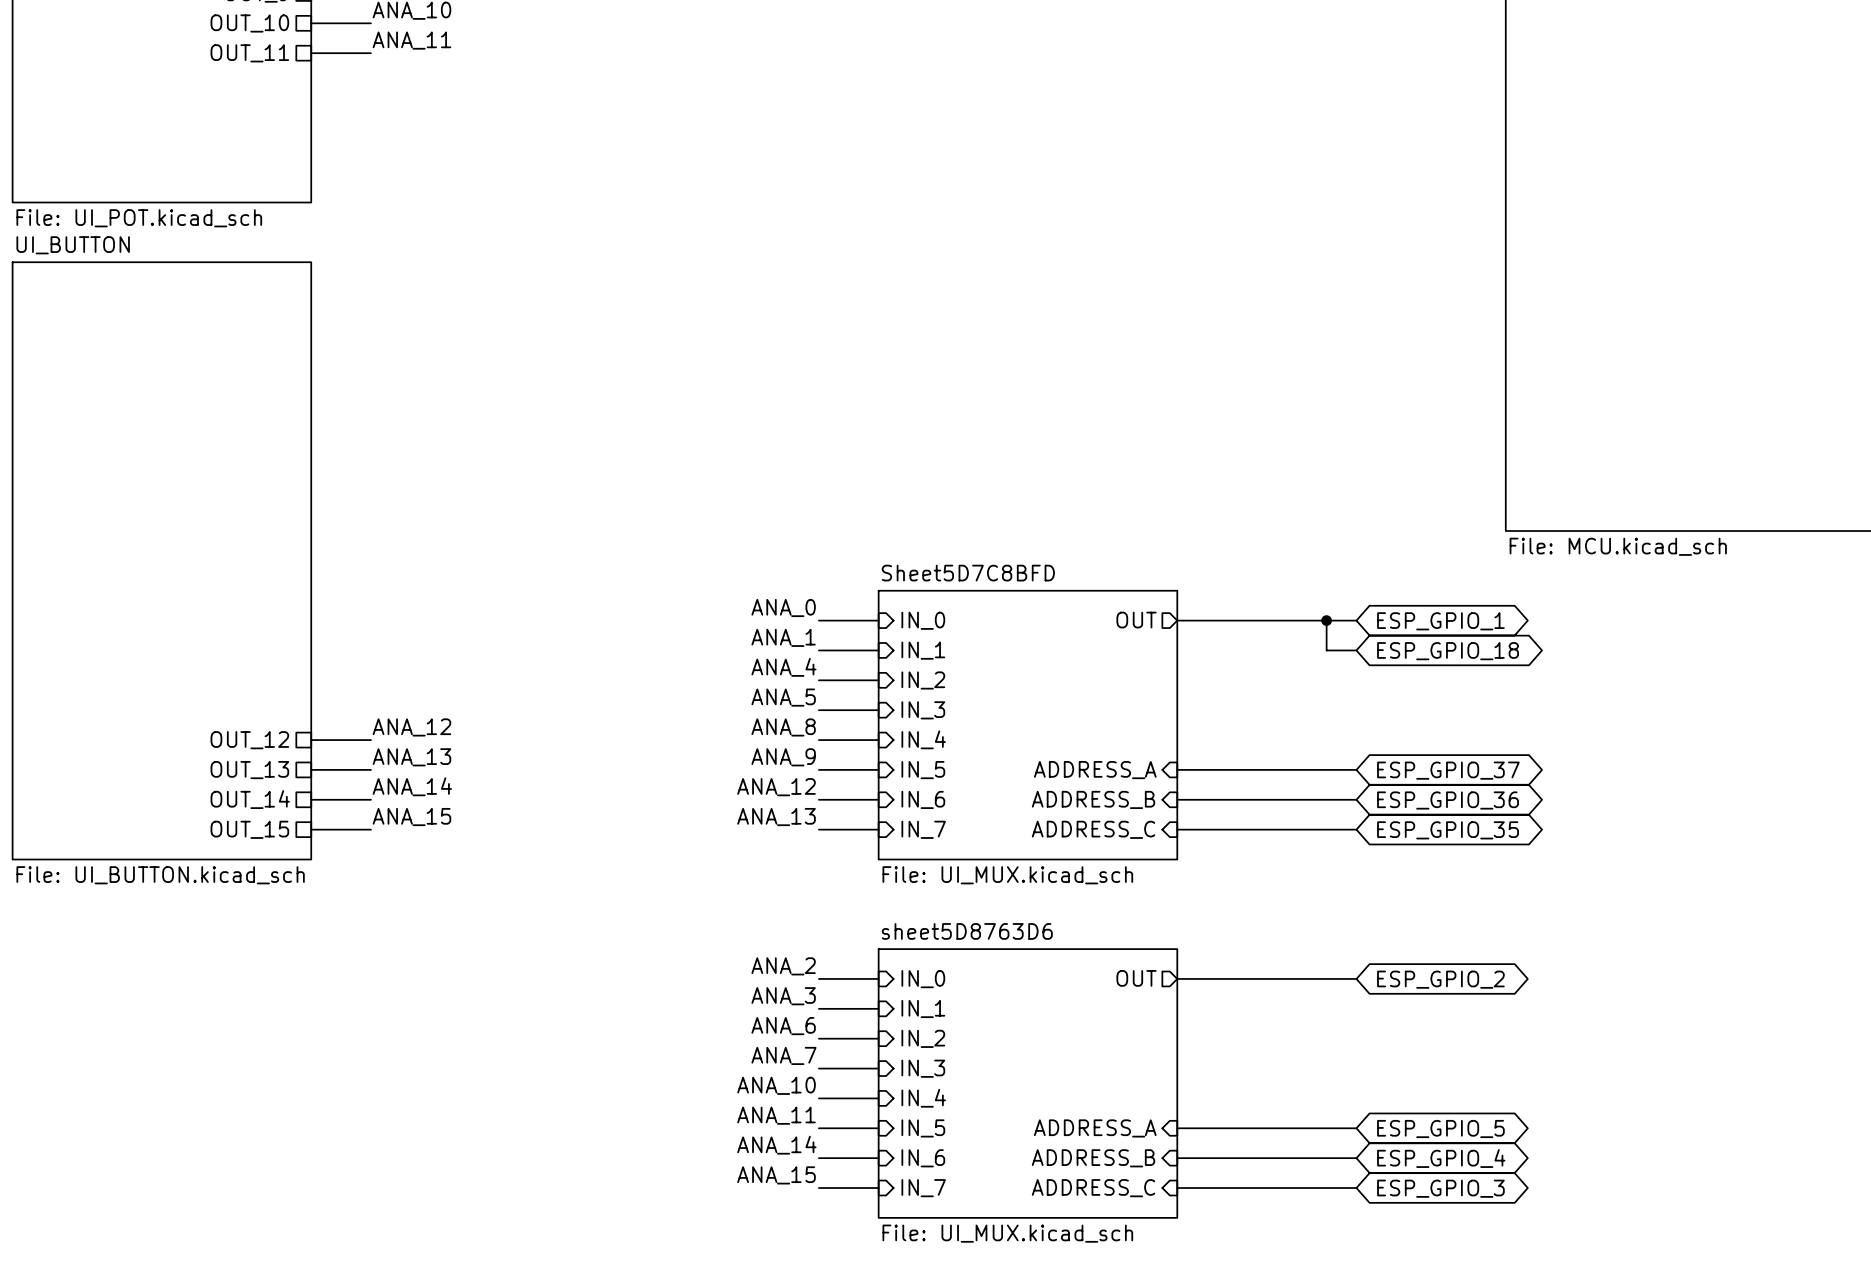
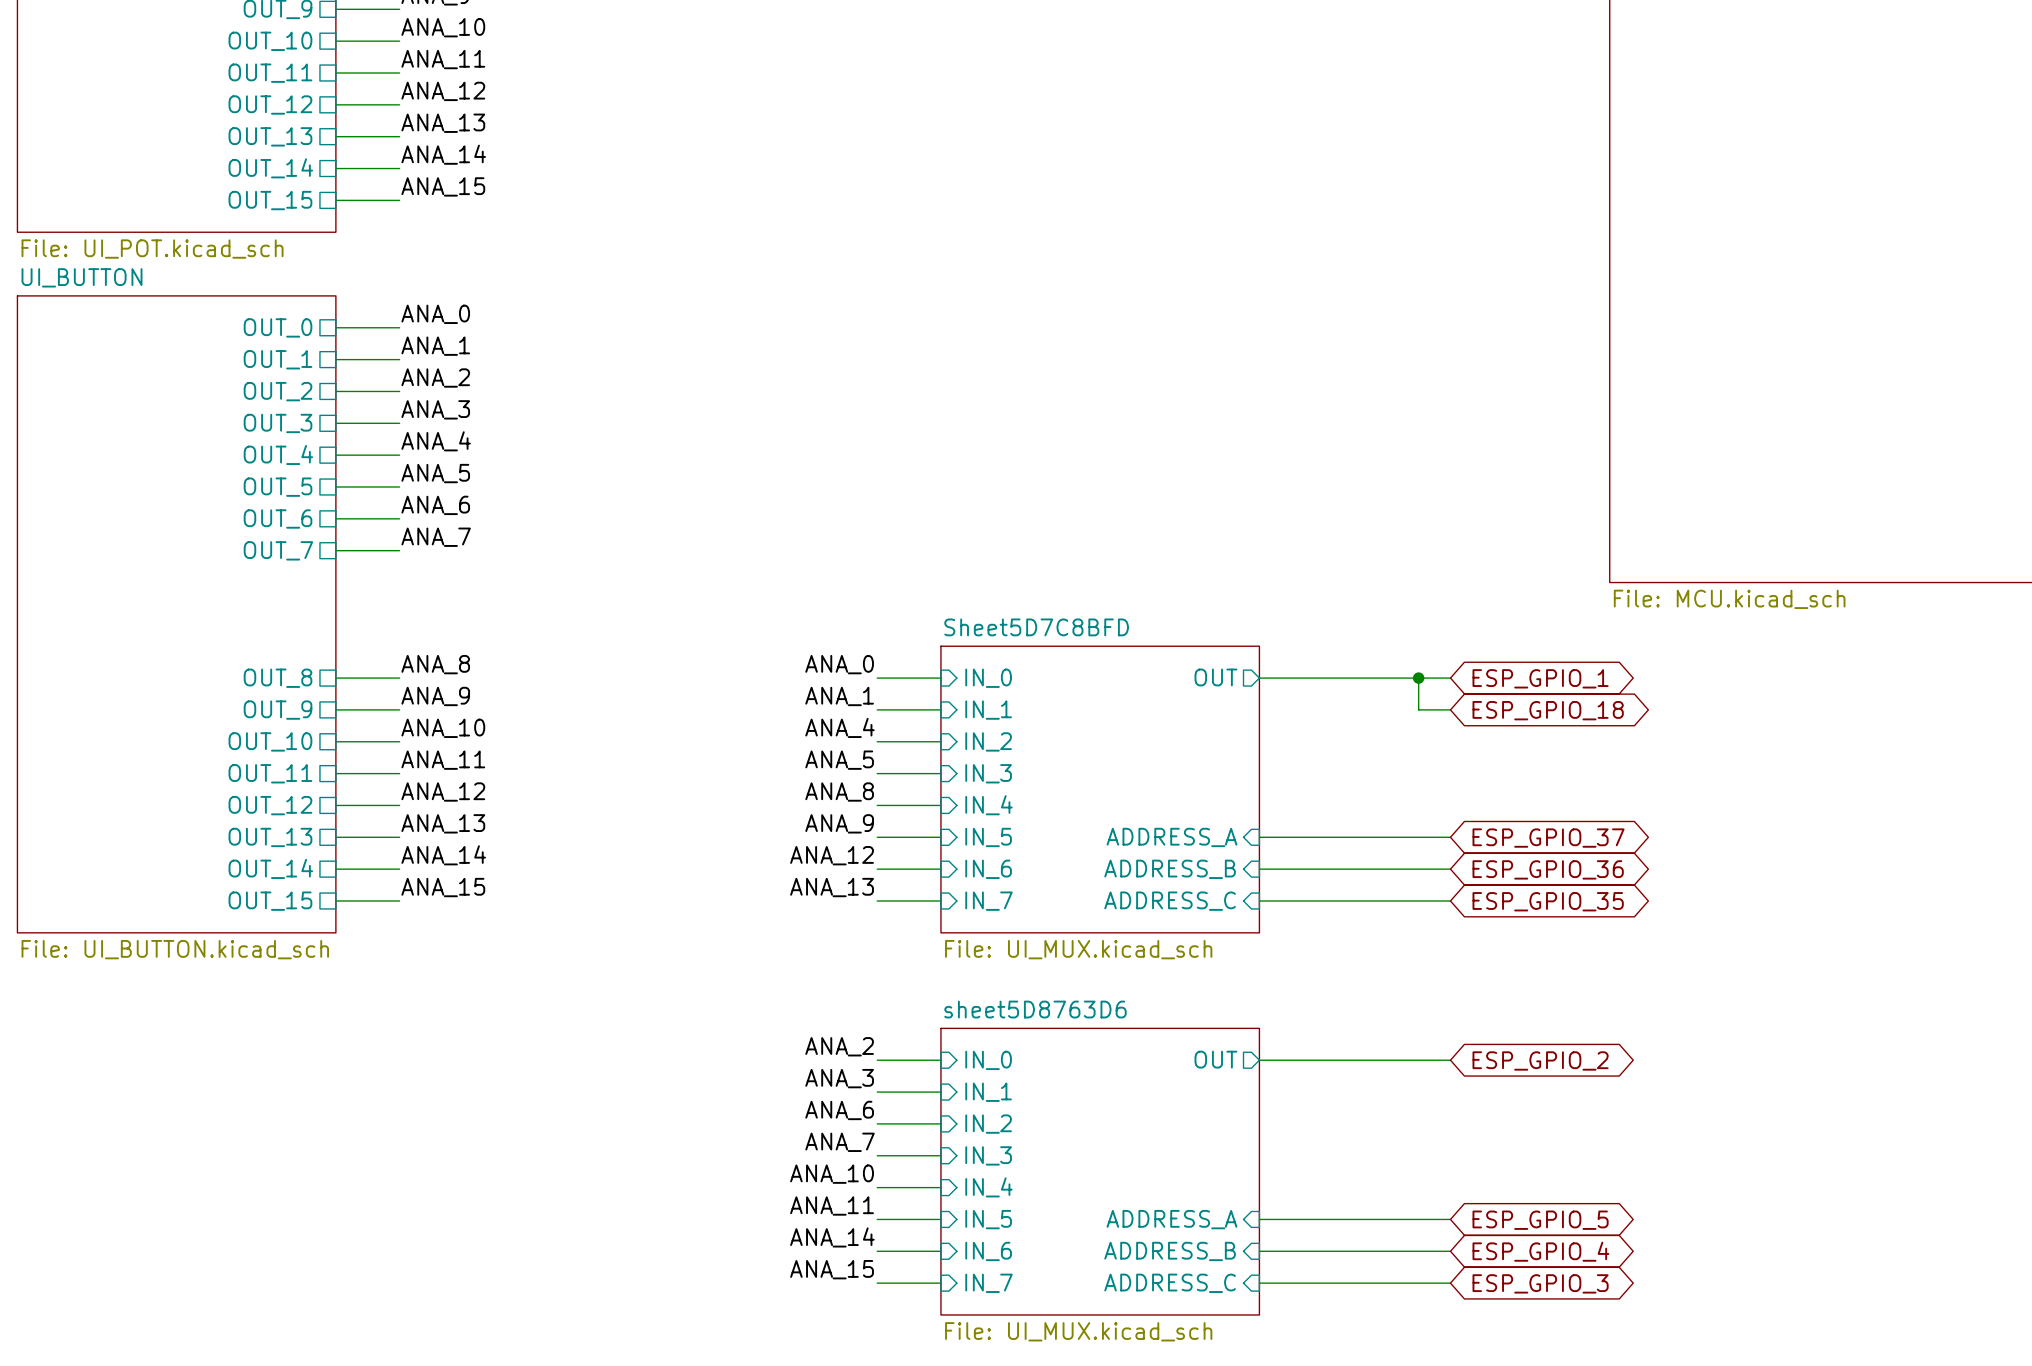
label: none -> ANA_12 (443, 91)
sheet pin: none -> OUT_12 (270, 105)
wire: none -> (335, 104) (399, 104)
label: none -> ANA_13 (443, 123)
wire: none -> (335, 136) (399, 136)
sheet pin: none -> OUT_13 (270, 136)
label: none -> ANA_14 (443, 154)
sheet pin: none -> OUT_14 (270, 168)
wire: none -> (335, 168) (399, 168)
label: none -> ANA_15 (443, 186)
sheet pin: none -> OUT_15 (270, 200)
wire: none -> (335, 200) (399, 200)
label: none -> ANA_0 (435, 314)
sheet pin: none -> OUT_0 (278, 327)
wire: none -> (335, 327) (399, 327)
label: none -> ANA_1 (435, 346)
wire: none -> (335, 359) (399, 359)
sheet pin: none -> OUT_1 (278, 359)
label: none -> ANA_2 (435, 378)
sheet pin: none -> OUT_2 (278, 391)
wire: none -> (335, 391) (399, 391)
label: none -> ANA_3 (435, 409)
sheet pin: none -> OUT_3 (278, 423)
wire: none -> (335, 423) (399, 423)
label: none -> ANA_4 (436, 441)
sheet pin: none -> OUT_4 (278, 454)
wire: none -> (335, 455) (399, 455)
label: none -> ANA_5 (435, 473)
sheet pin: none -> OUT_5 (278, 487)
wire: none -> (335, 486) (399, 486)
label: none -> ANA_6 (435, 505)
sheet pin: none -> OUT_6 (278, 519)
wire: none -> (335, 518) (399, 518)
label: none -> ANA_7 (436, 537)
sheet pin: none -> OUT_7 (278, 550)
wire: none -> (335, 550) (399, 550)
label: none -> ANA_8 (435, 664)
sheet pin: none -> OUT_8 (278, 678)
wire: none -> (335, 678) (399, 678)
label: none -> ANA_9 (435, 696)
sheet pin: none -> OUT_9 (278, 710)
wire: none -> (335, 709) (399, 709)
label: none -> ANA_10 (443, 728)
sheet pin: none -> OUT_10 (270, 741)
wire: none -> (335, 741) (399, 741)
label: none -> ANA_11 (443, 760)
sheet pin: none -> OUT_11 (270, 773)
wire: none -> (335, 773) (399, 773)

